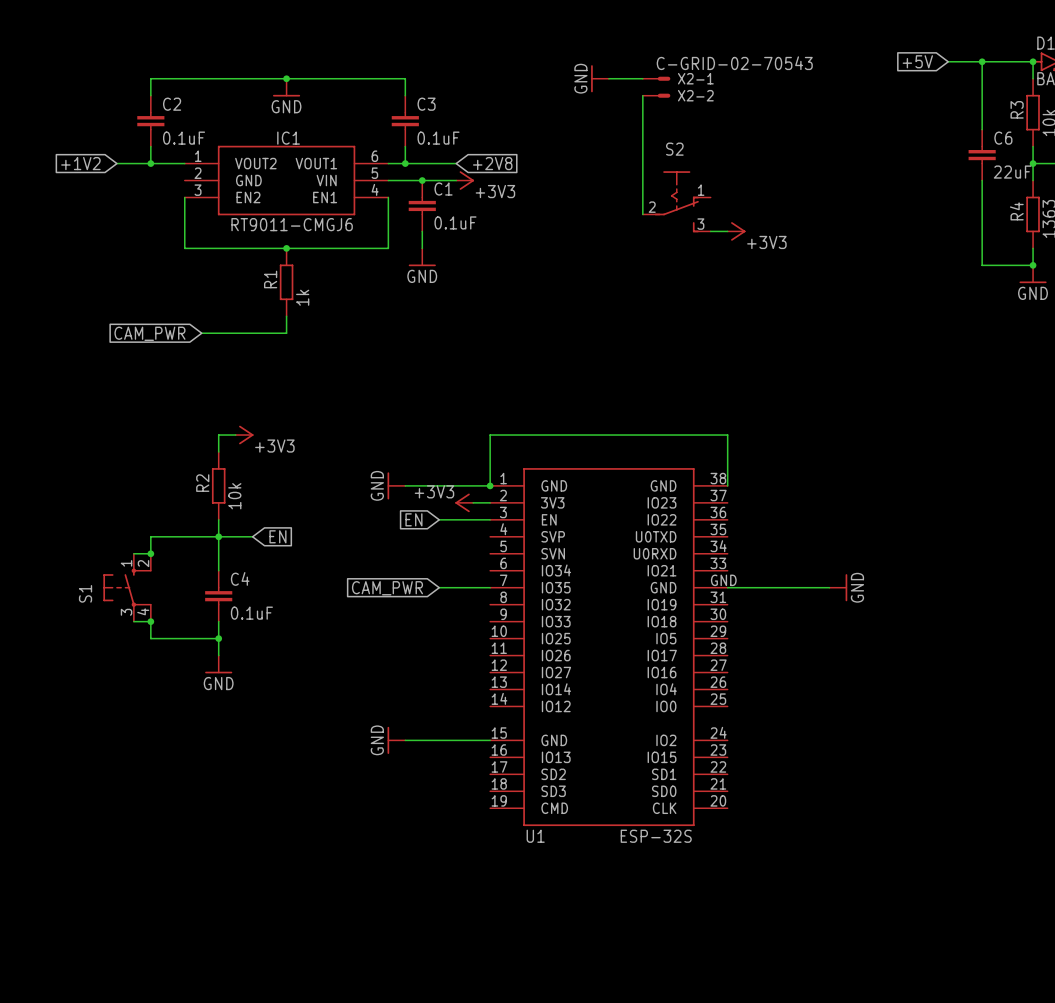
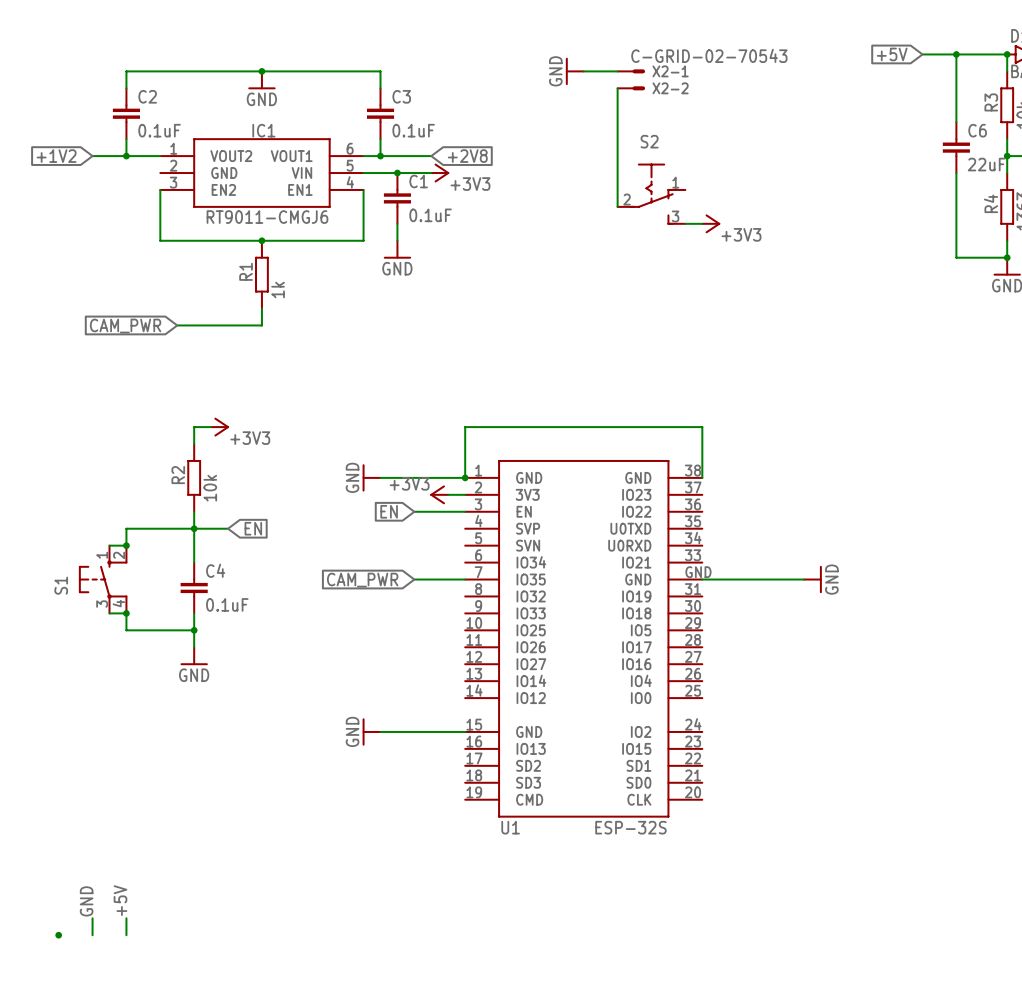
label: none -> +5V (120, 900)
label: none -> GND (86, 901)
wire: none -> (92, 918) (92, 935)
wire: none -> (126, 918) (126, 935)
junction: none -> (58, 935)

